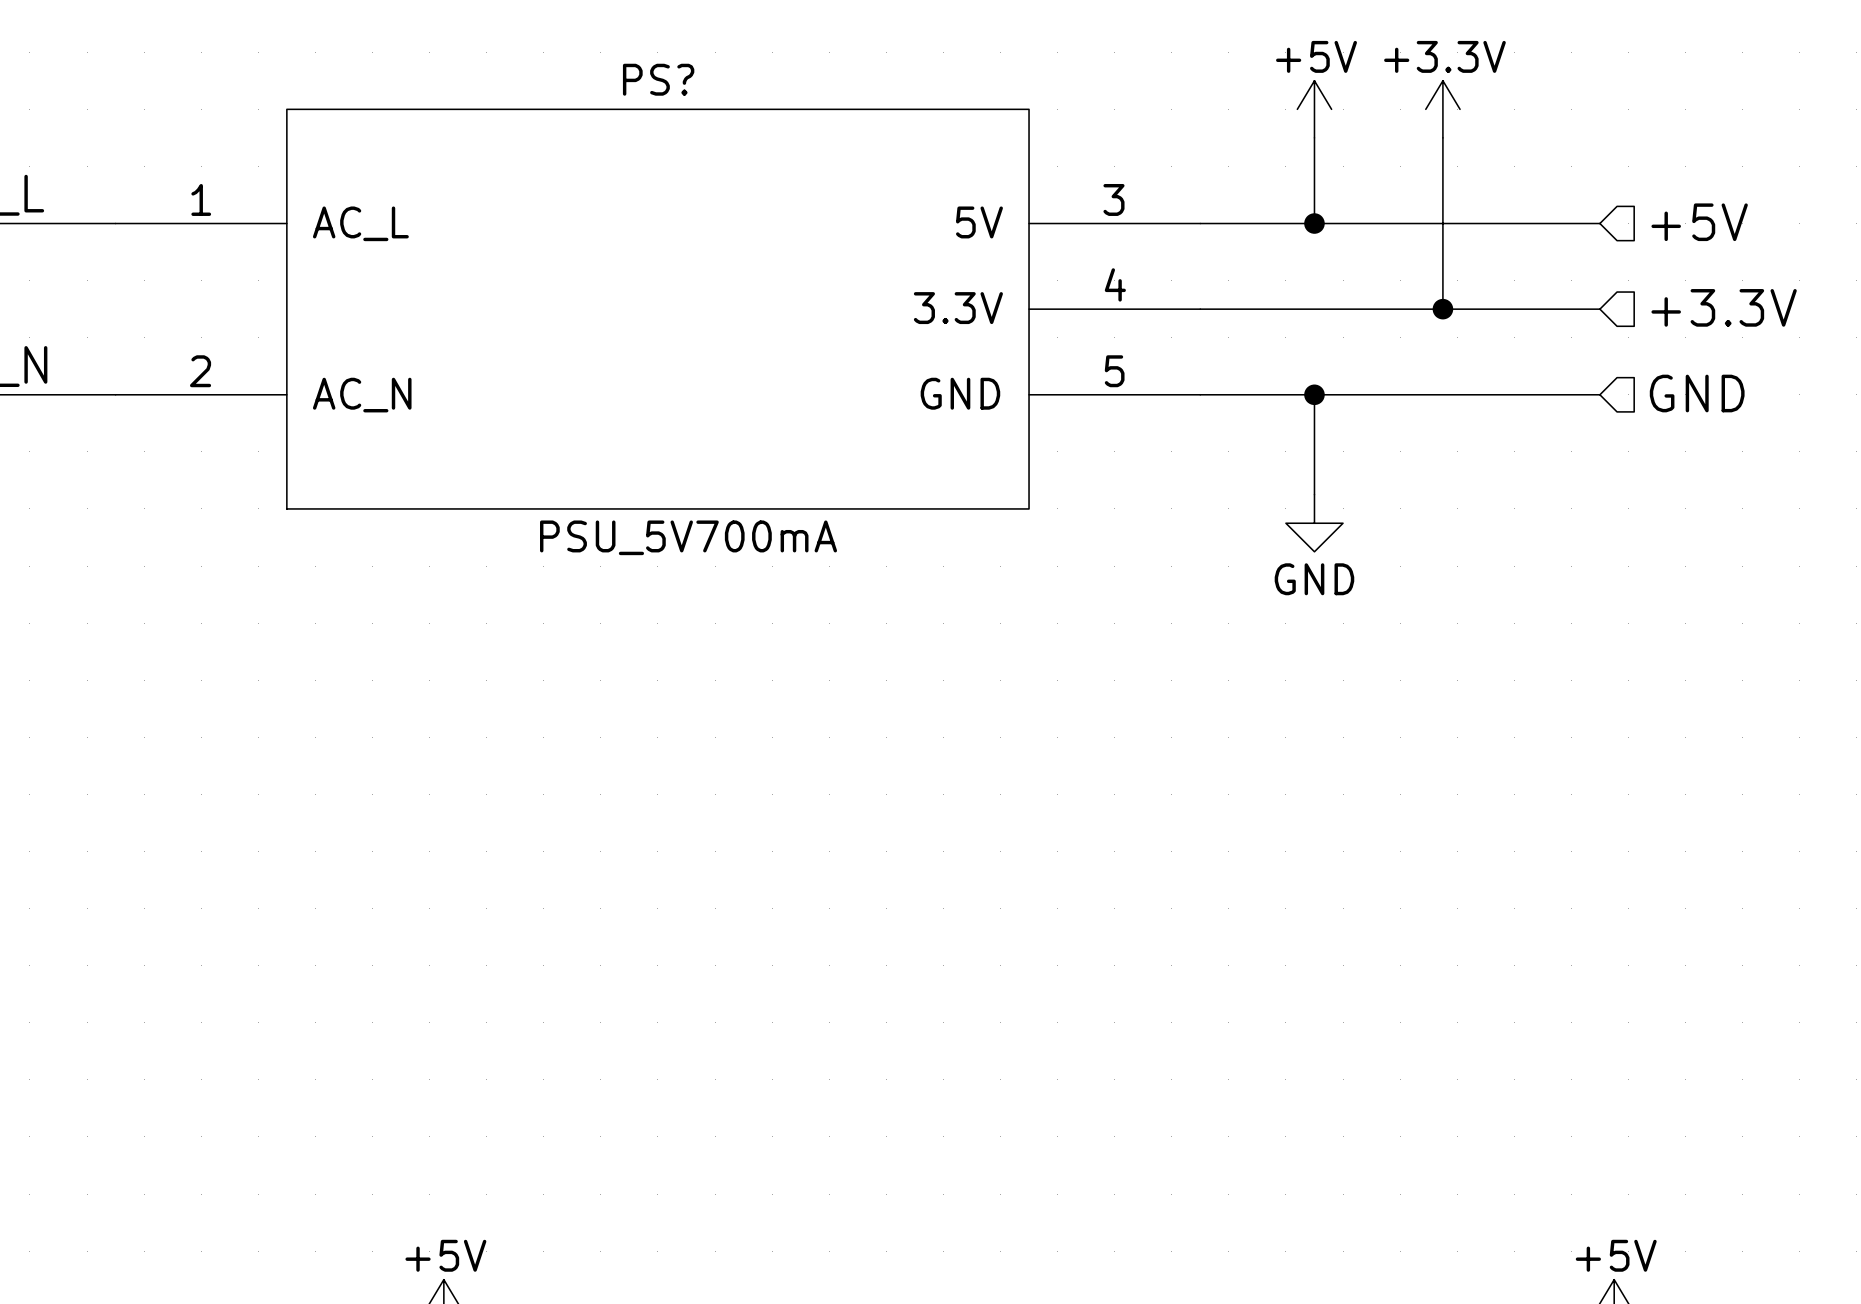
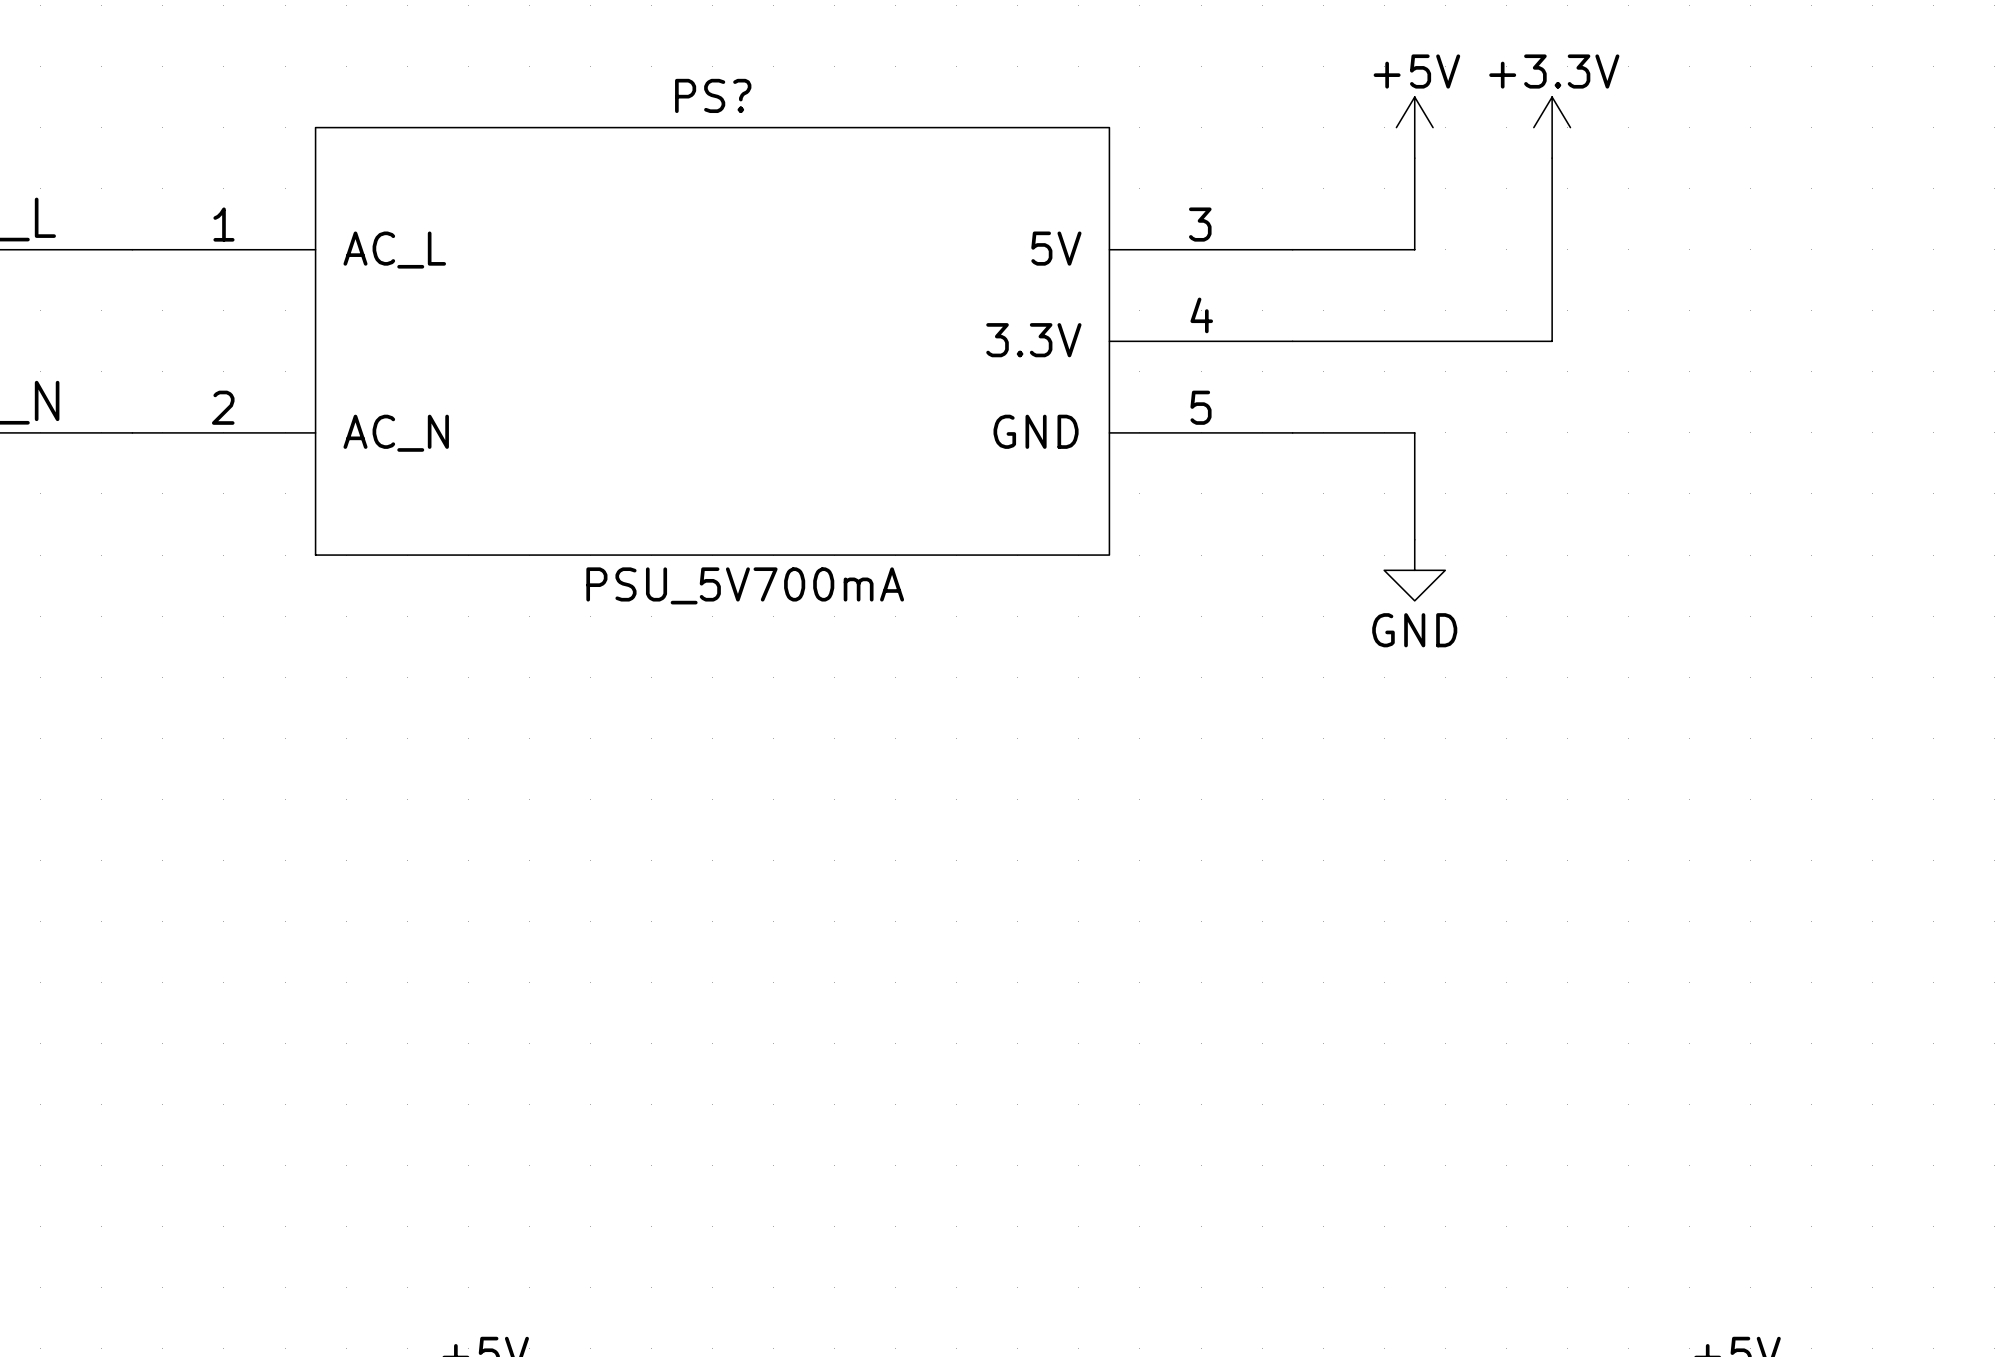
hierarchical label: +5V (1699, 222) -> none
wire: (1314, 223) (1599, 223) -> none
junction: (1314, 223) -> none
hierarchical label: +3.3V (1724, 307) -> none
wire: (1442, 309) (1599, 309) -> none
junction: (1442, 309) -> none
hierarchical label: GND (1697, 393) -> none
wire: (1314, 394) (1599, 394) -> none
junction: (1314, 394) -> none

